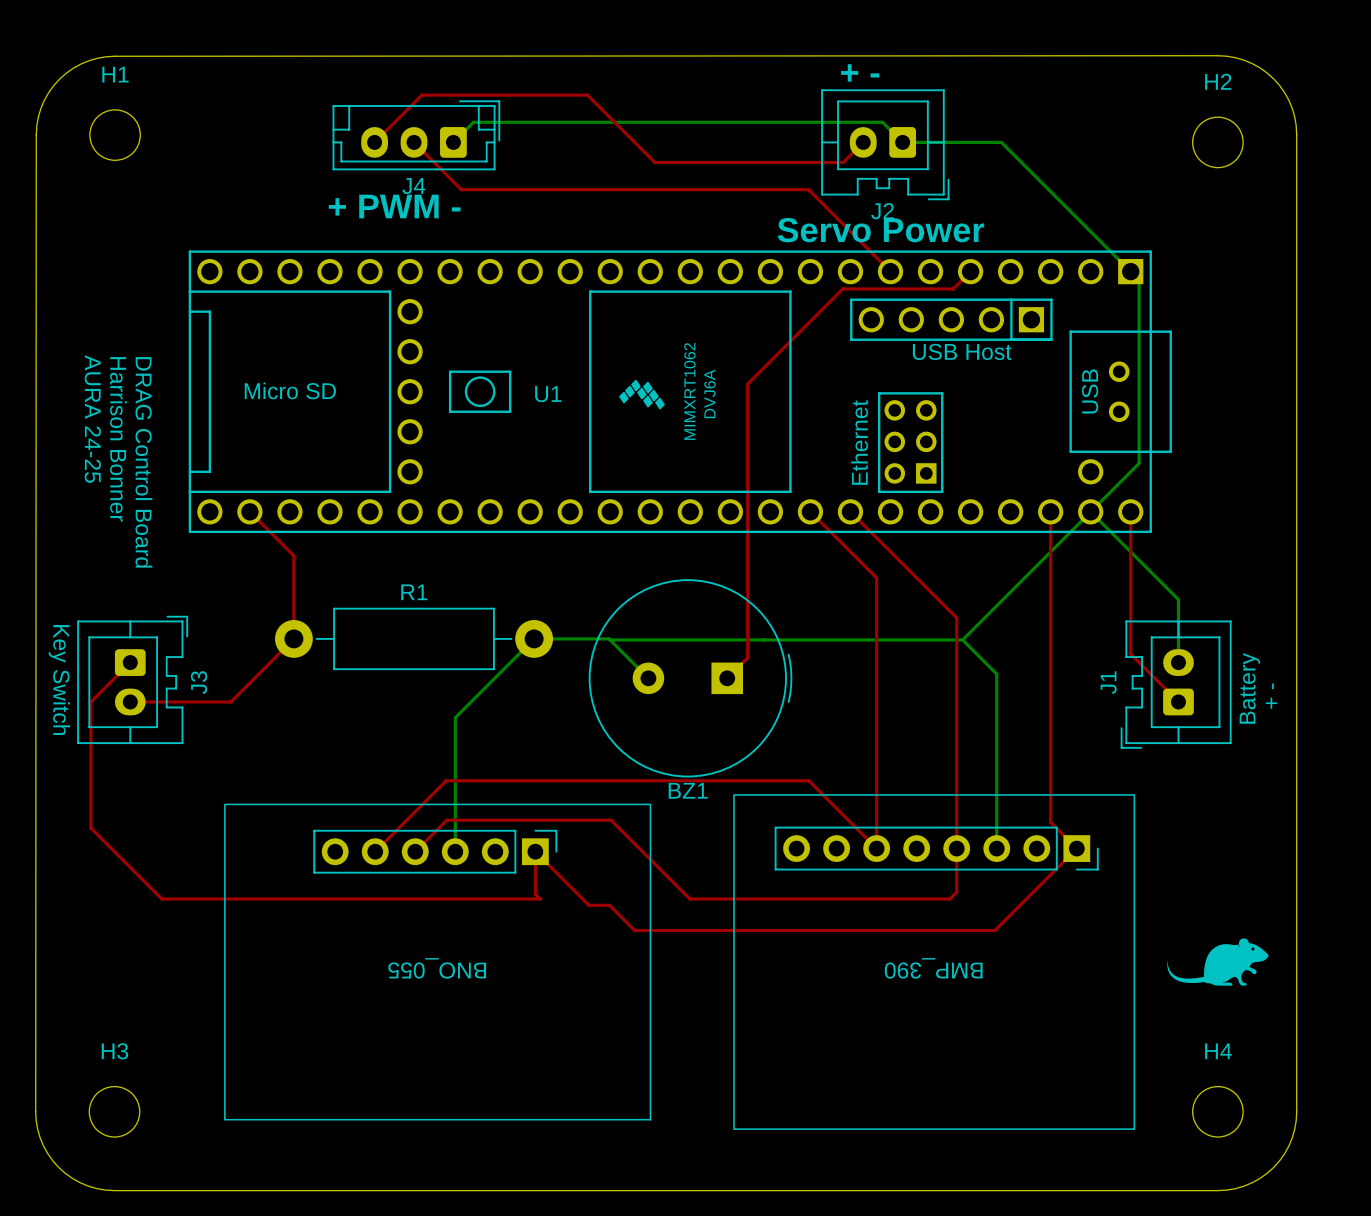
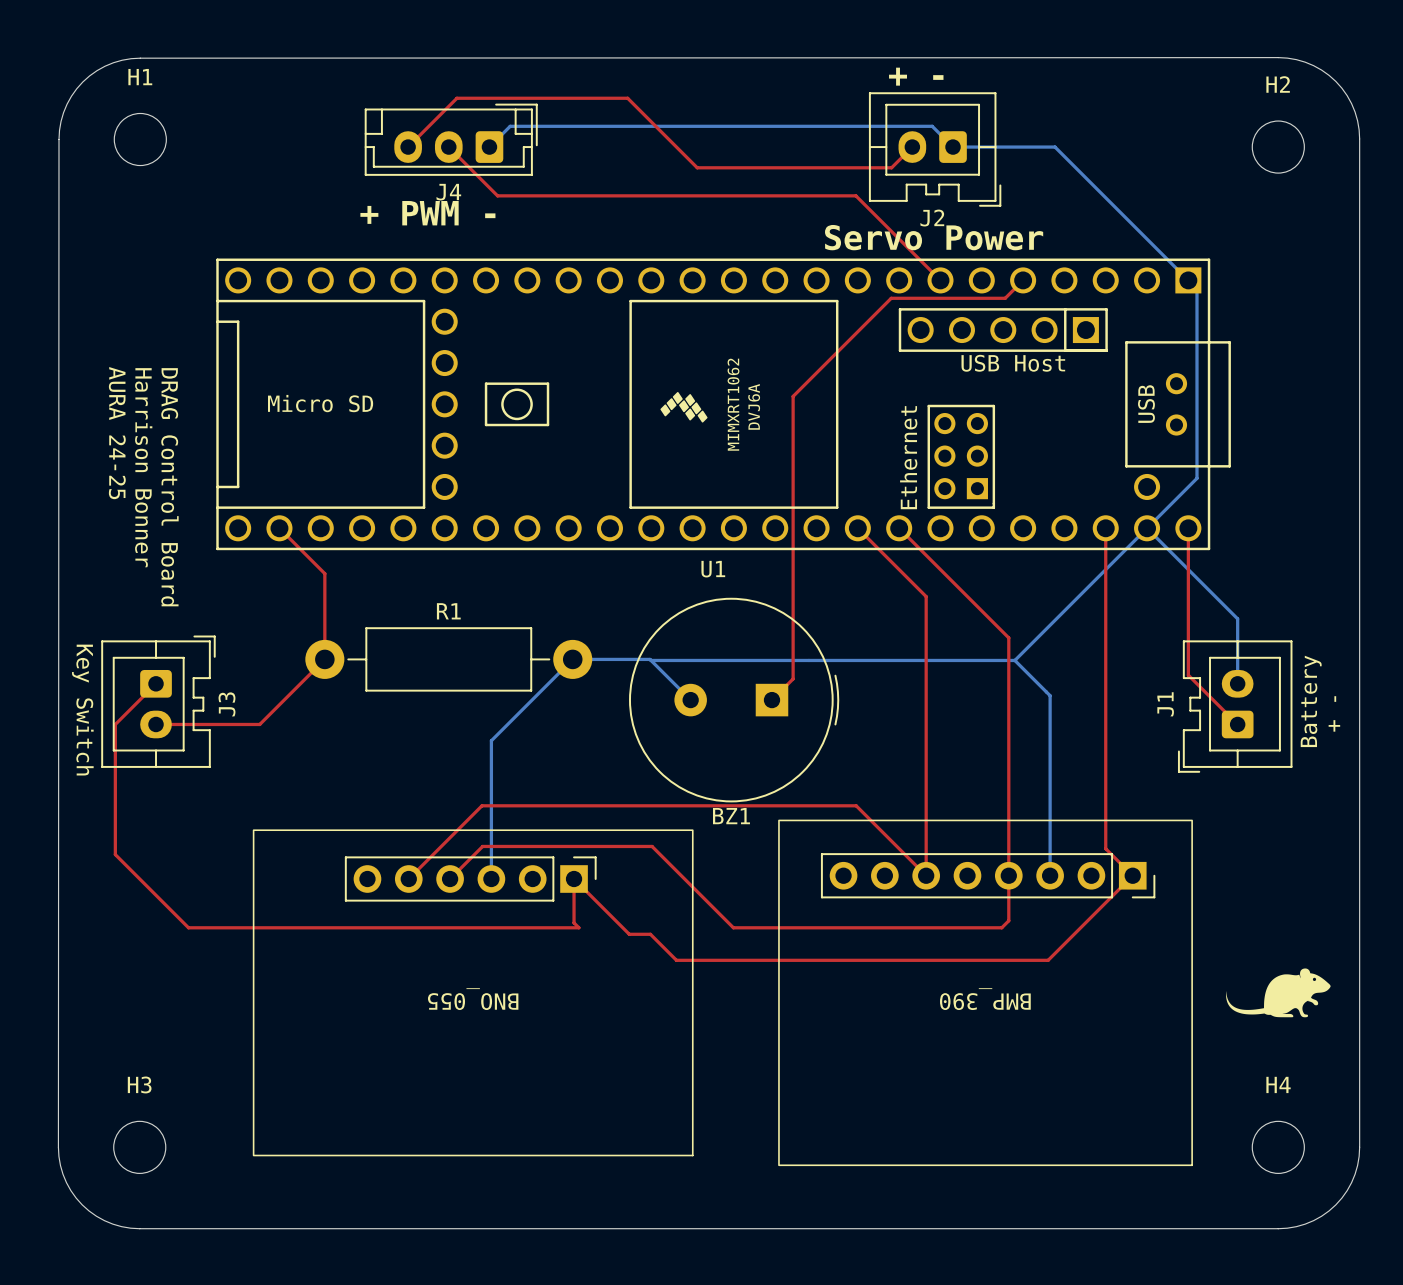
U1 name position: U1 (548, 394) -> U1 (713, 569)

